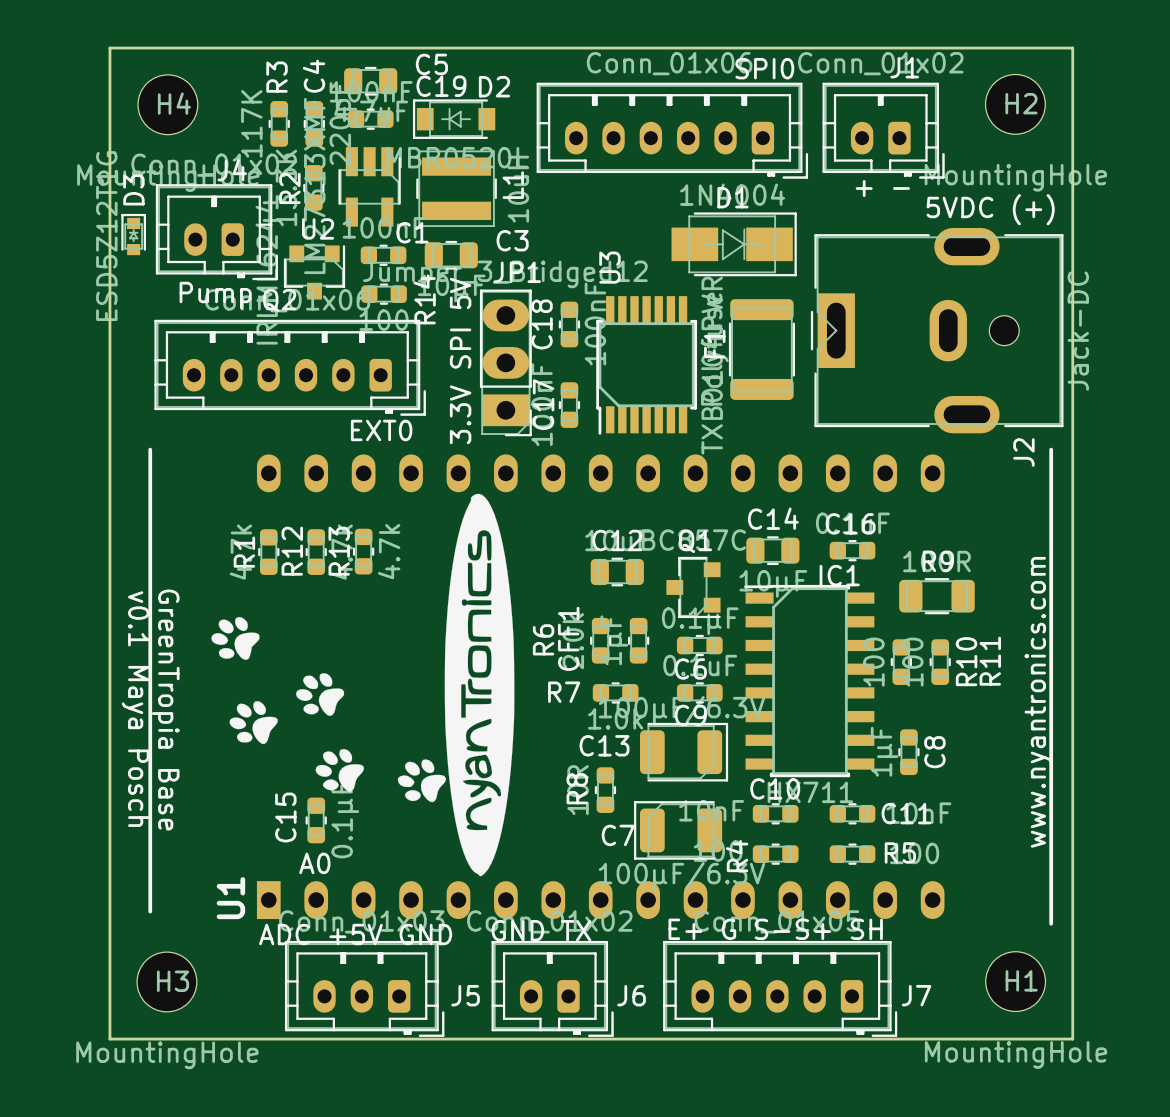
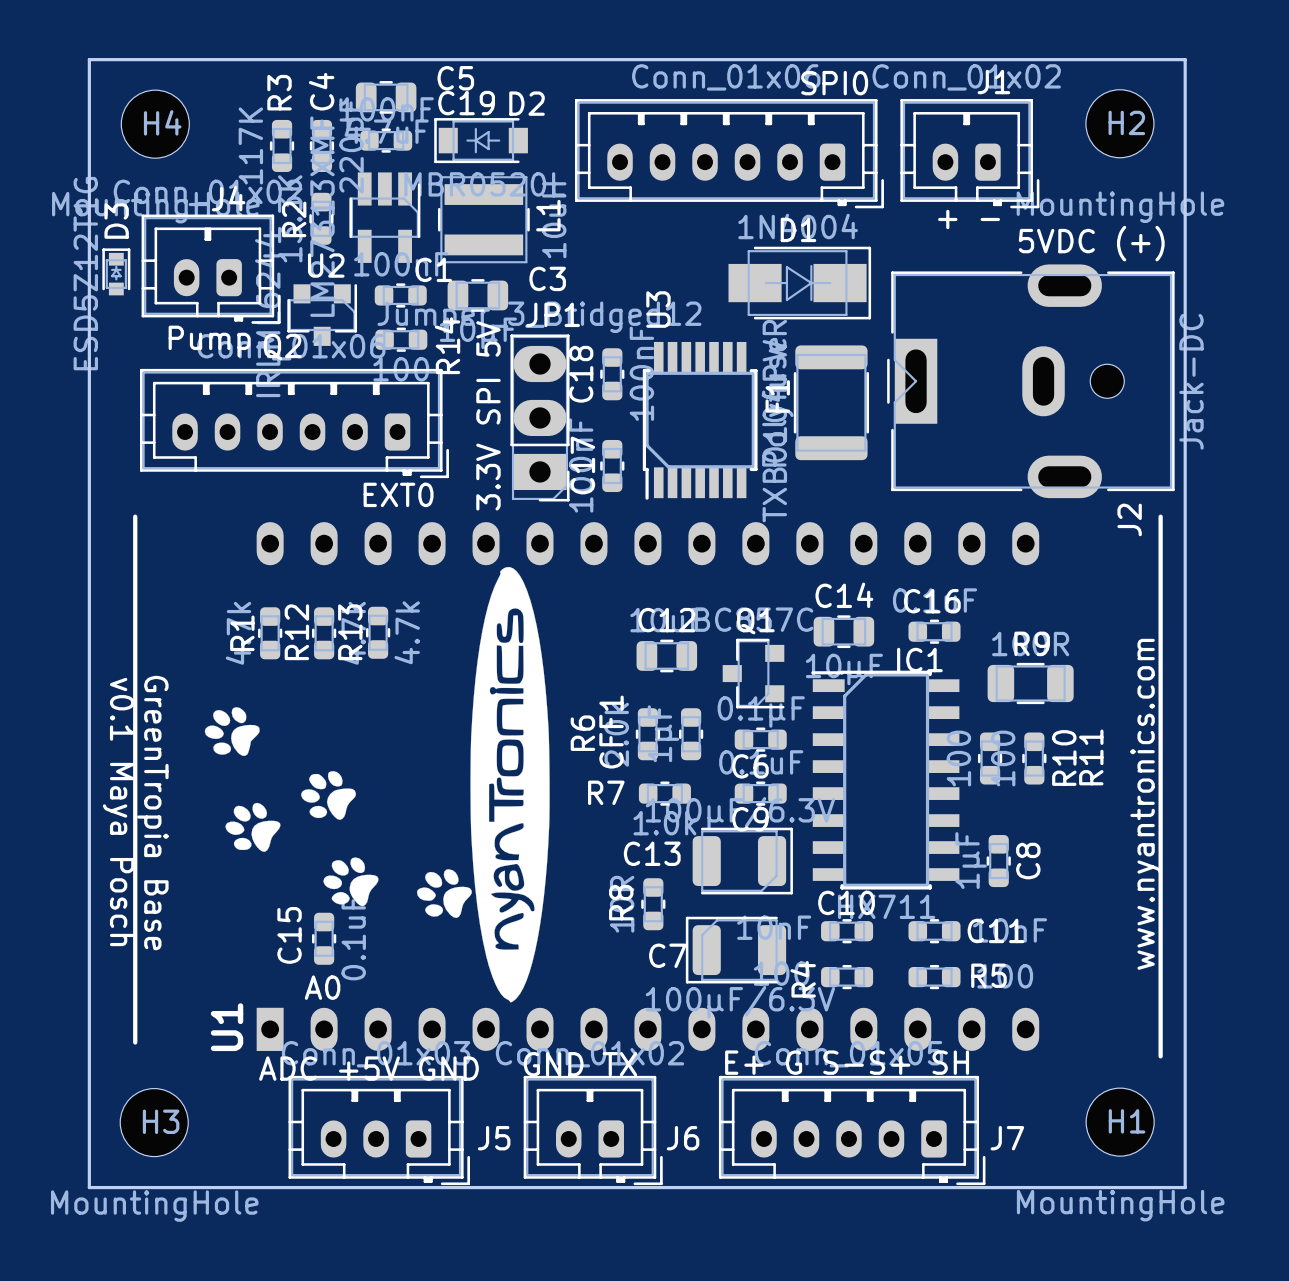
C15 value: 0.1µF (345, 820) -> 0.1uF (353, 938)

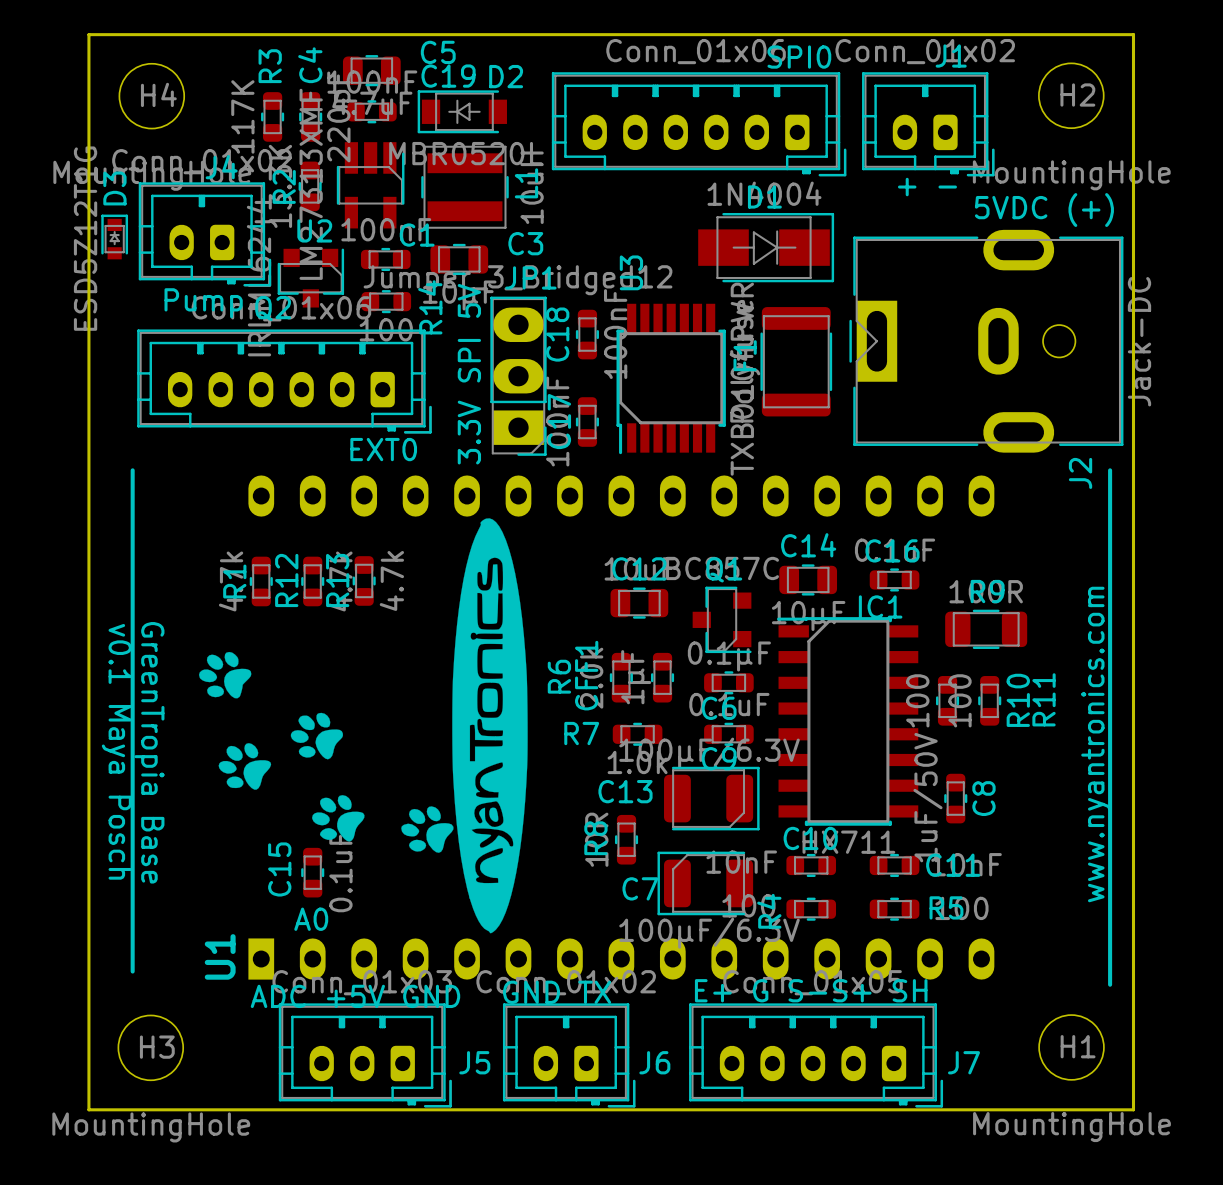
C8 value: 1µF (971, 860) -> 1uF/50V (927, 797)

